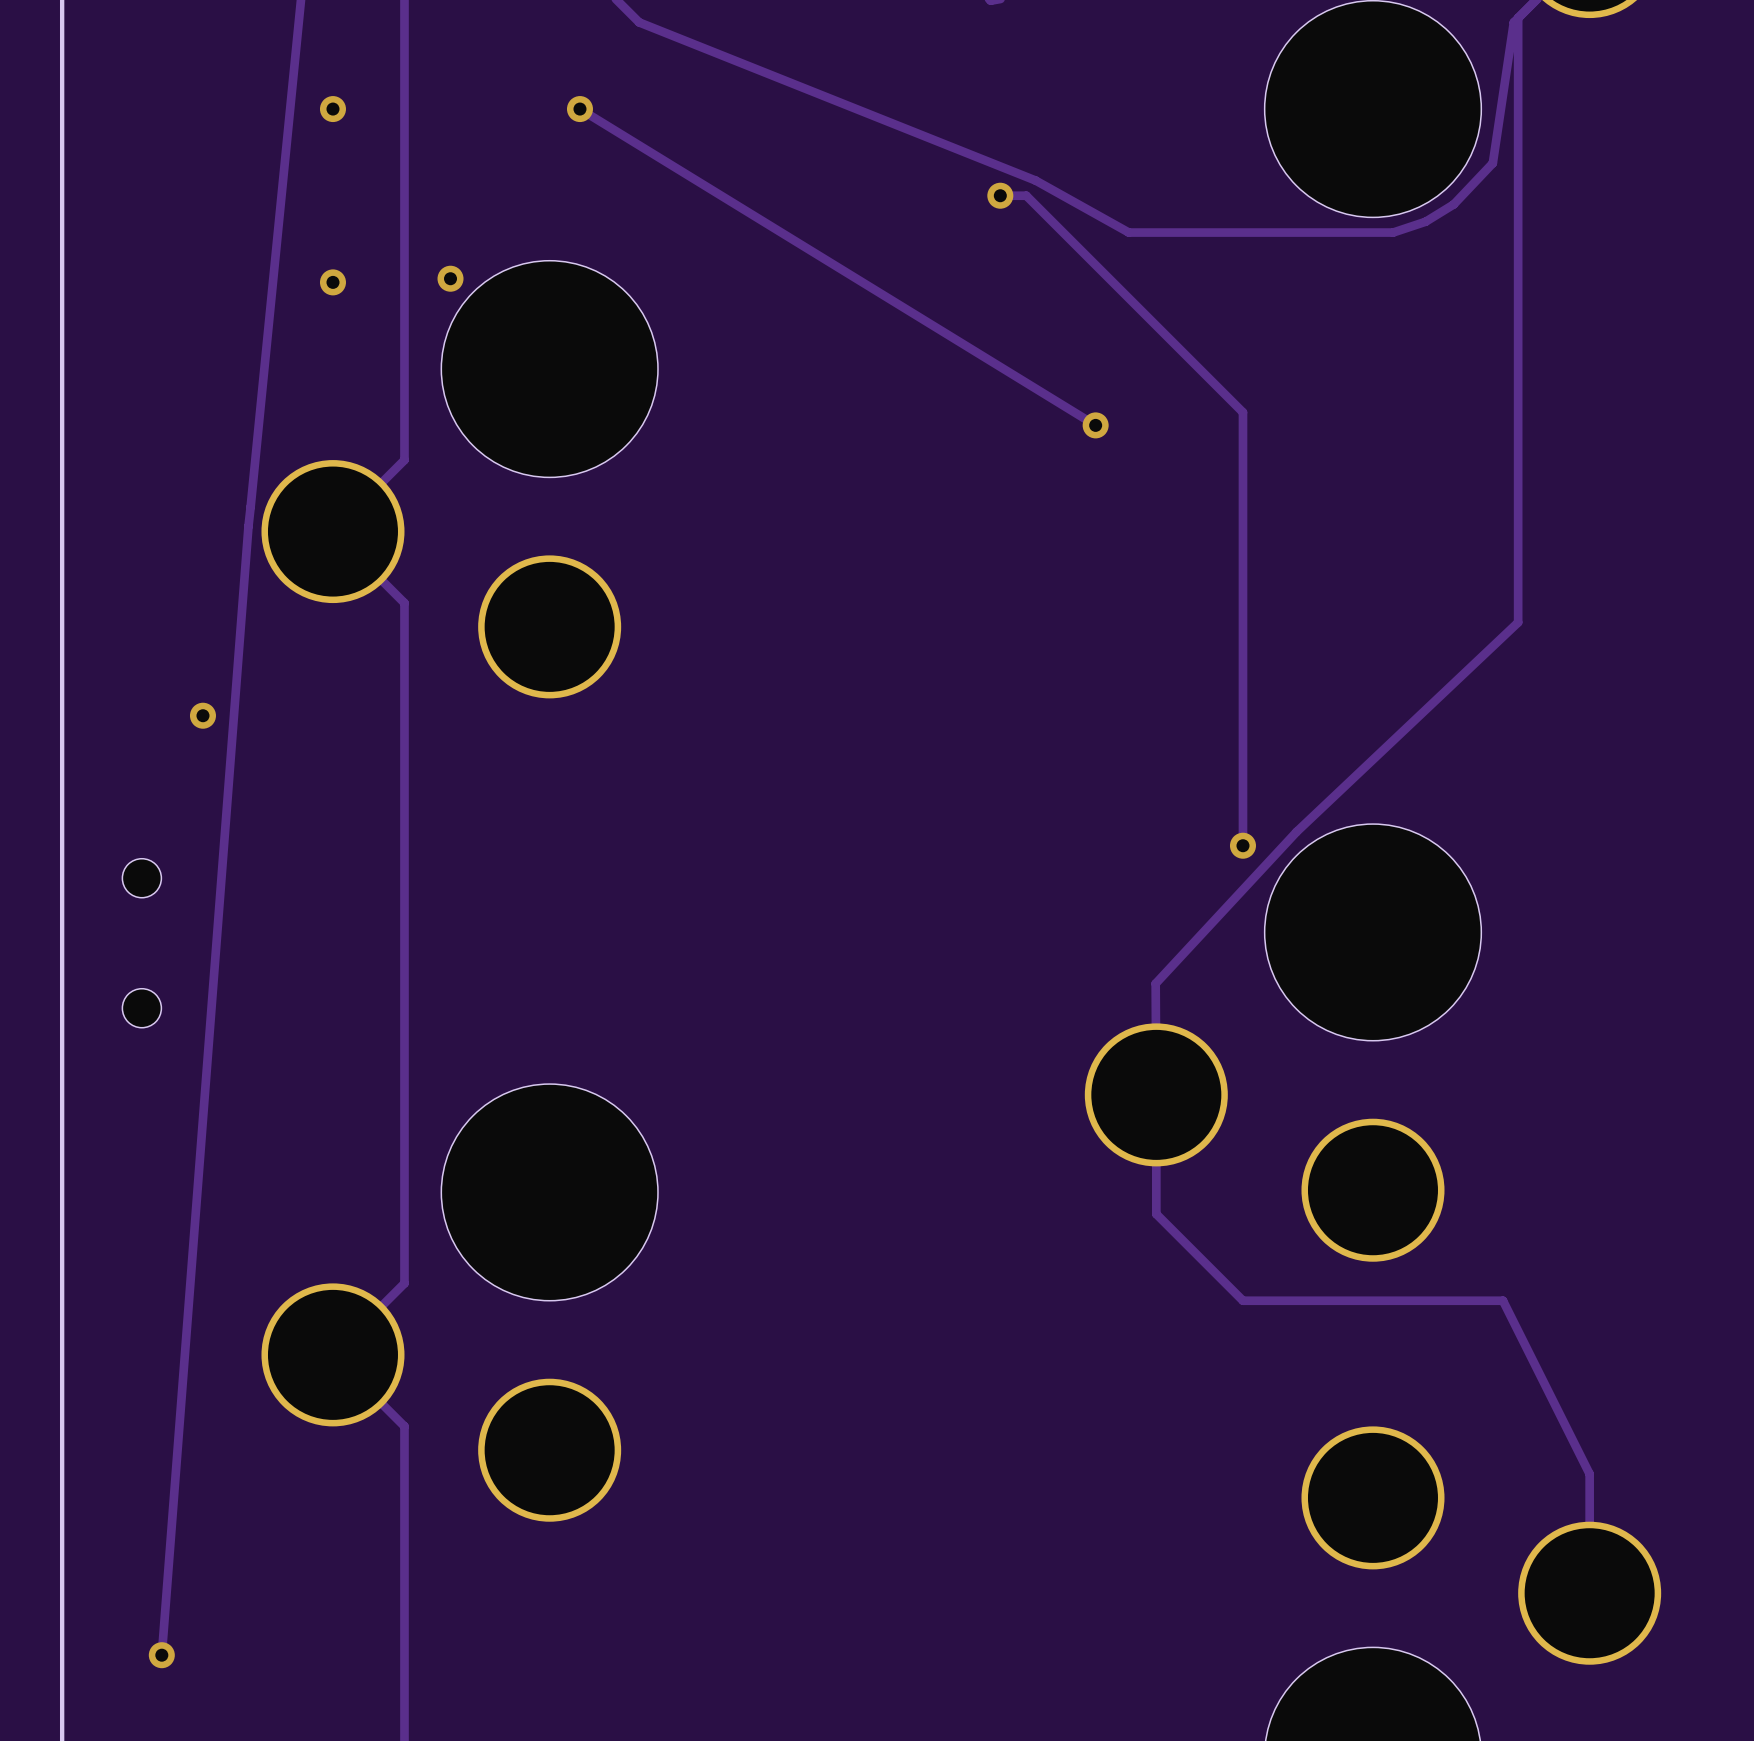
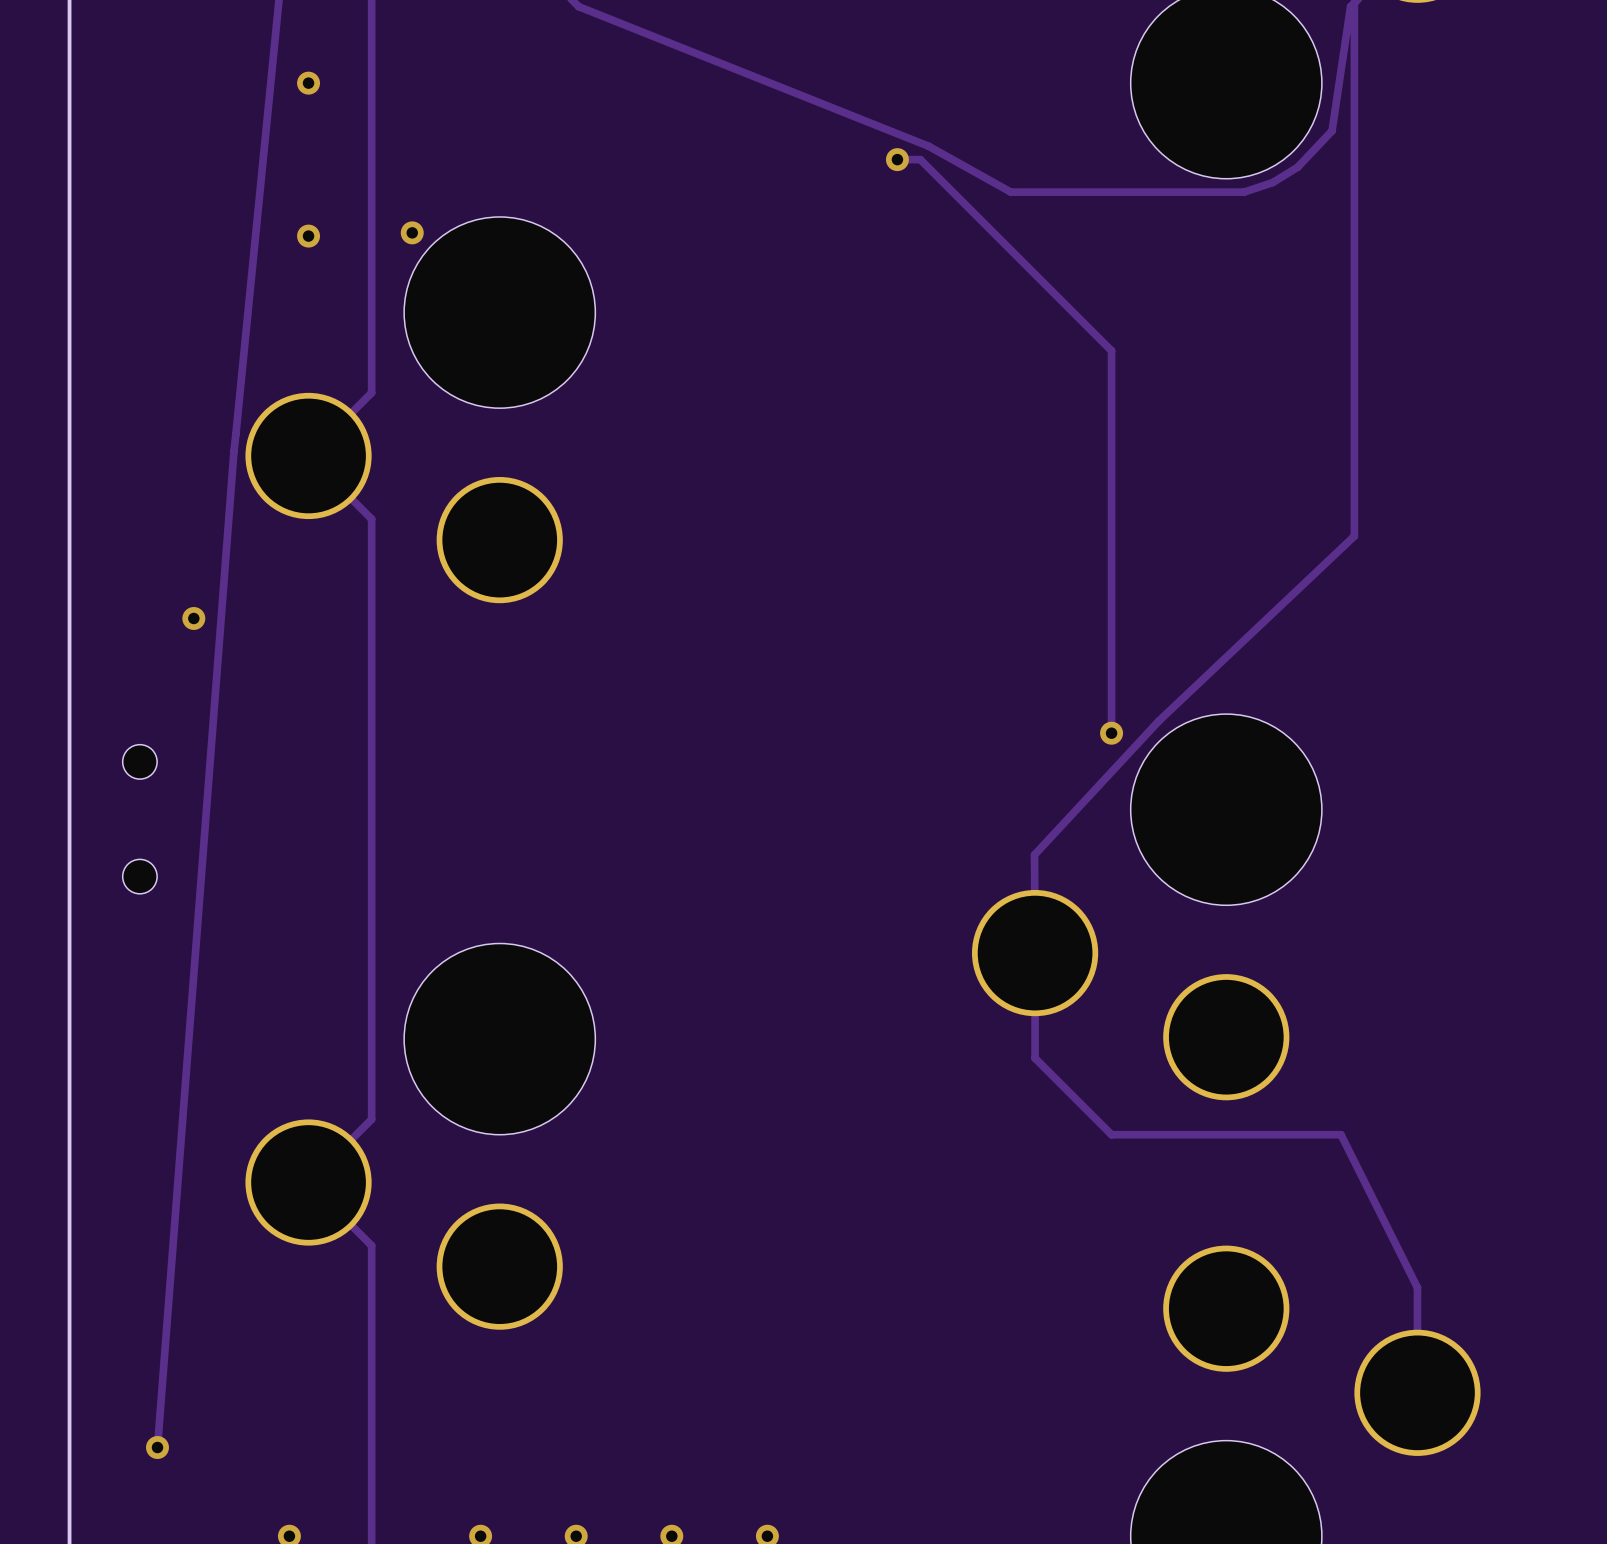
track: (579, 109) (1095, 425) -> none
via: (579, 109) -> none
via: (1095, 425) -> none

